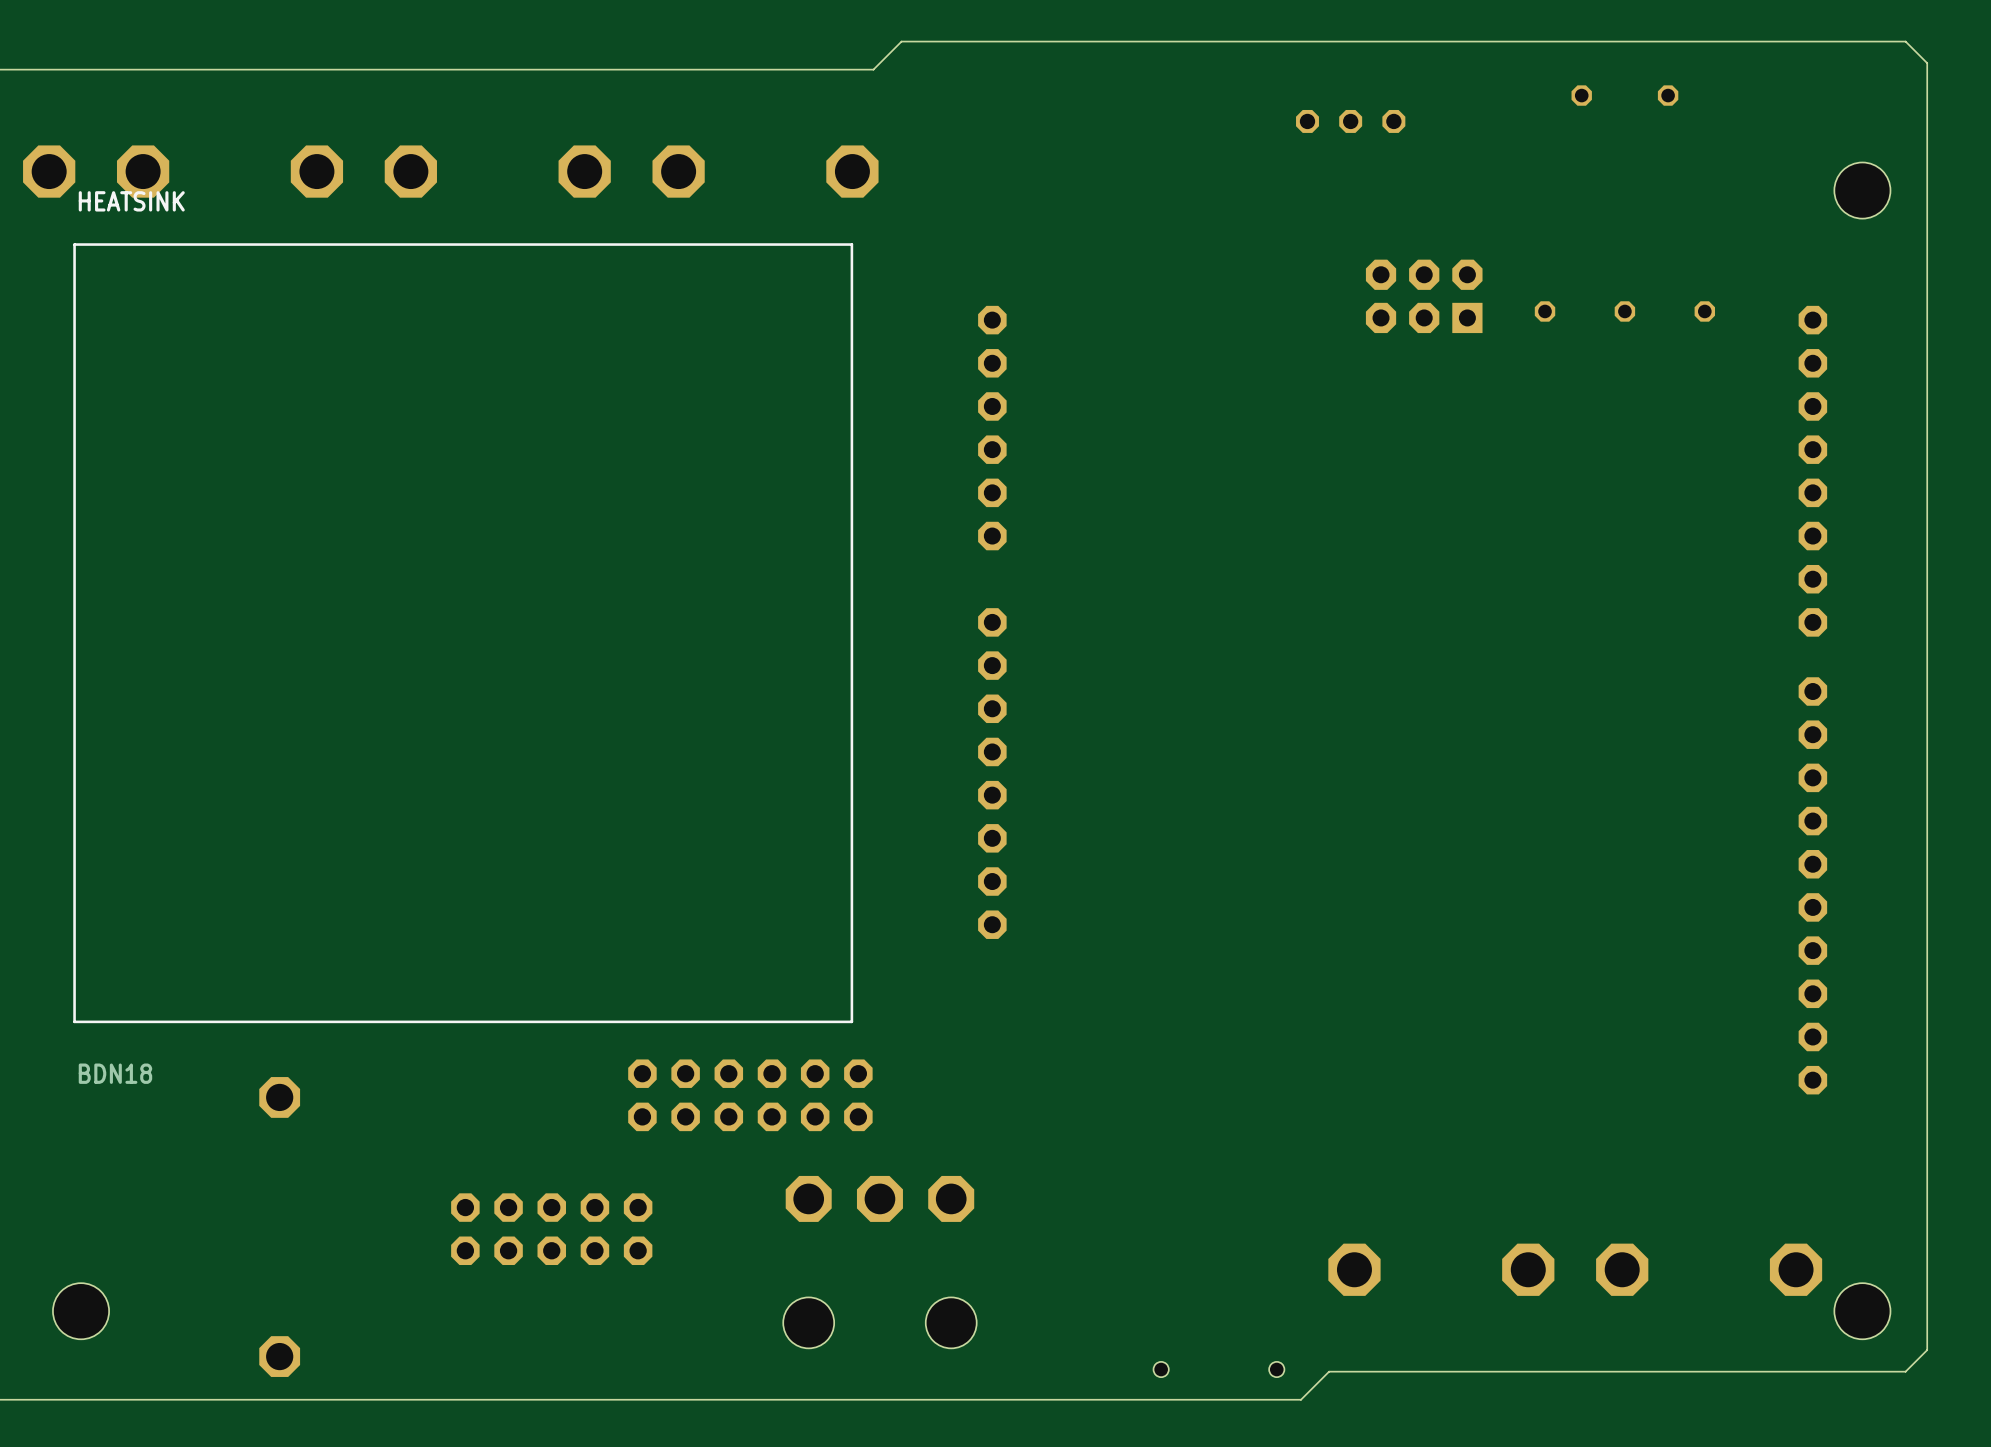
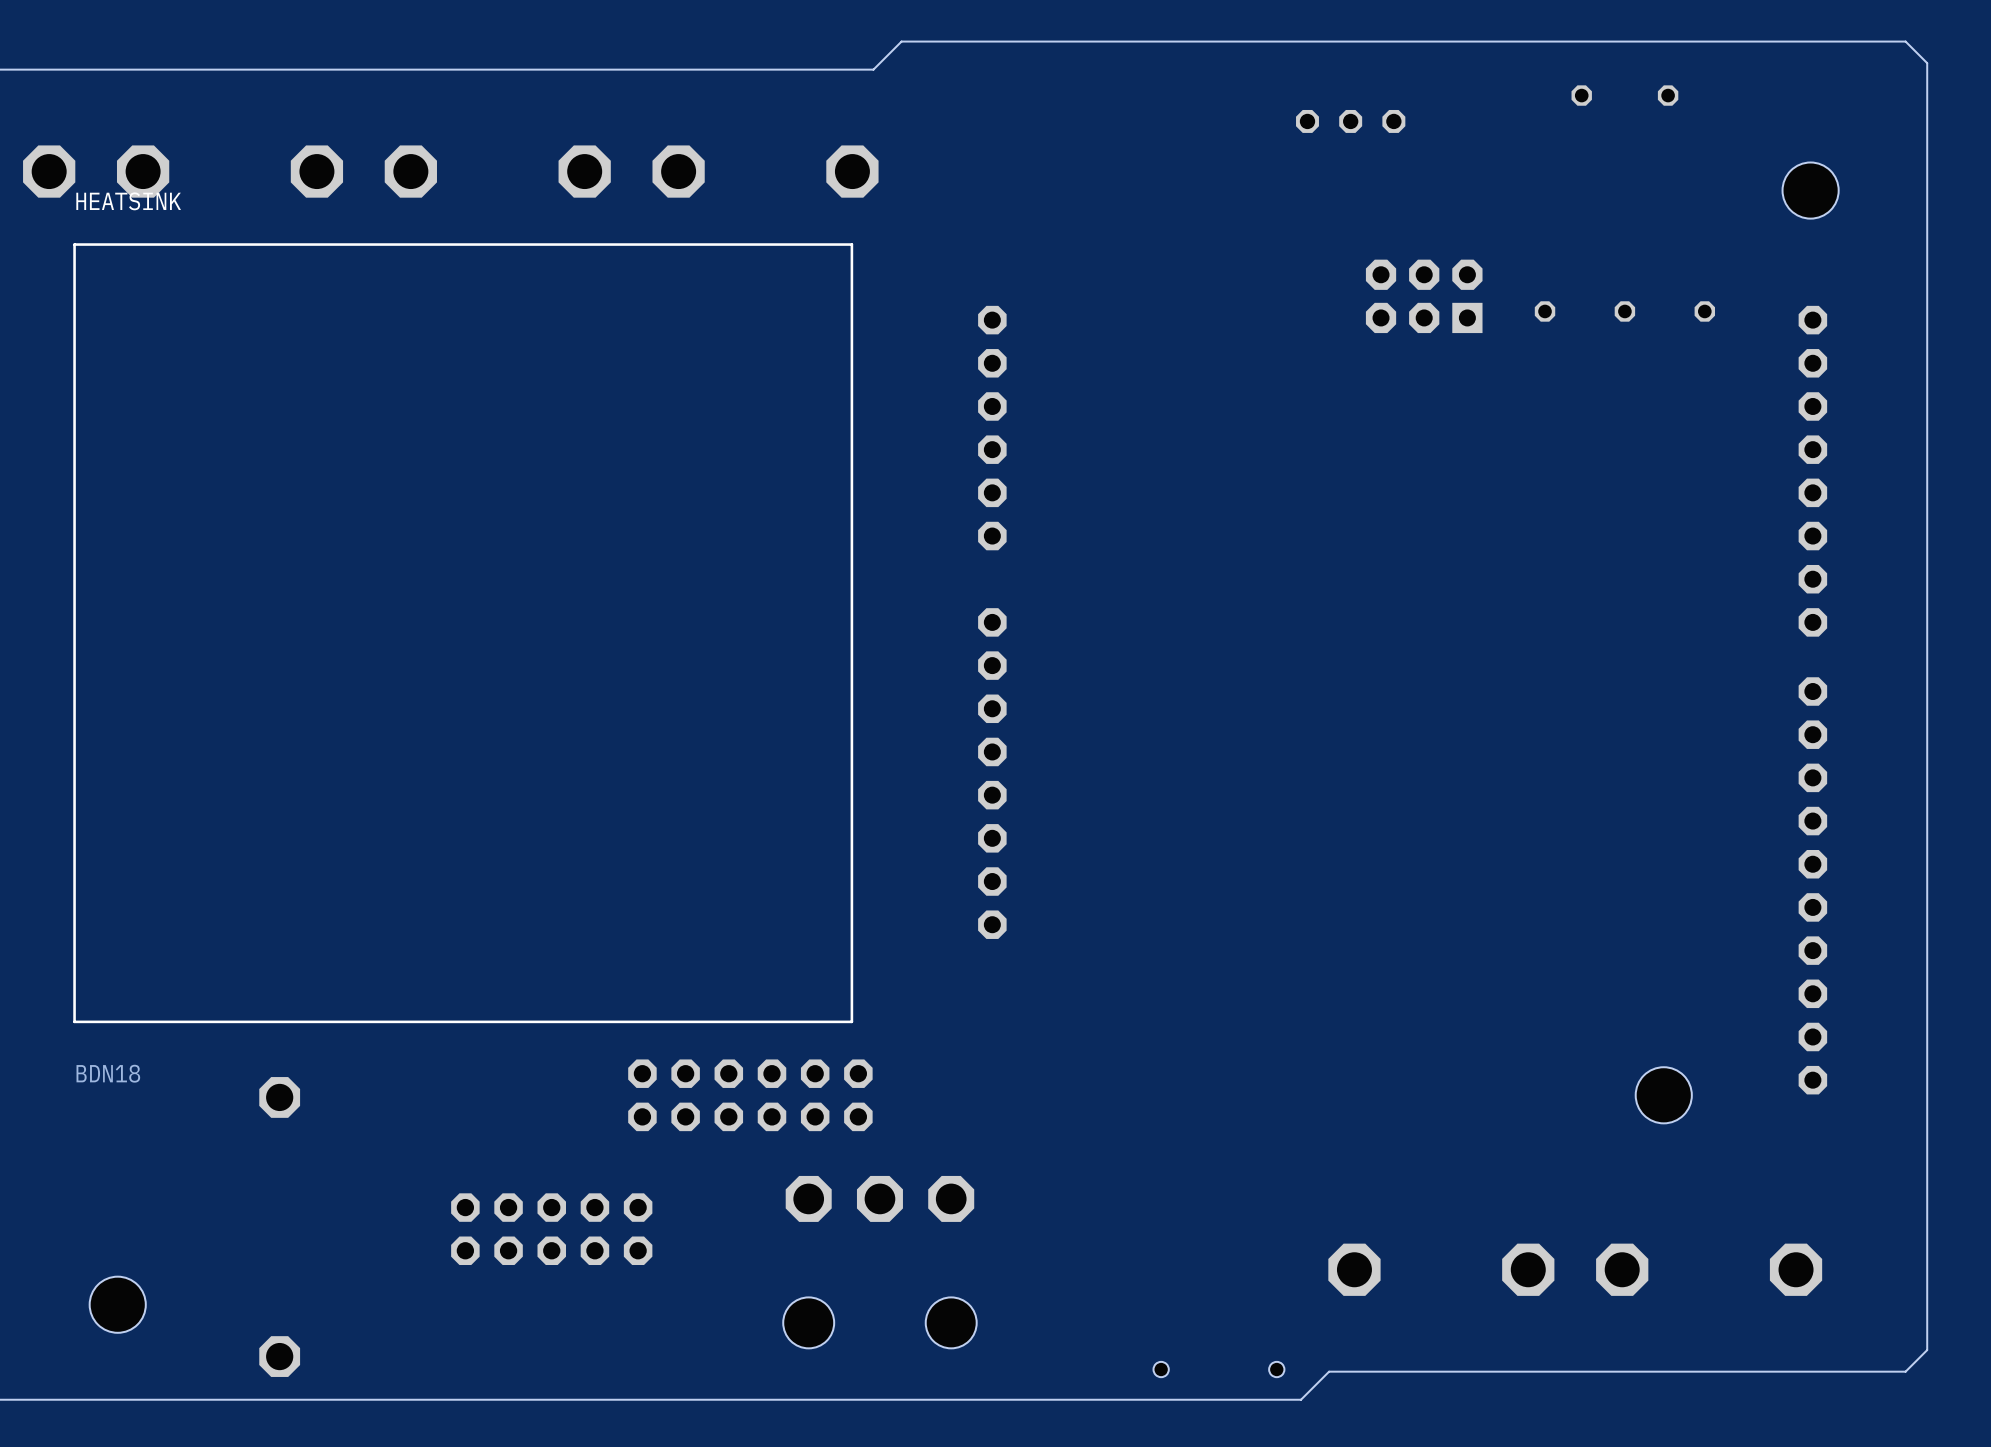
hole position: (1862, 190) -> (1810, 190)
hole position: (81, 1311) -> (117, 1304)
hole position: (1862, 1311) -> (1663, 1095)

